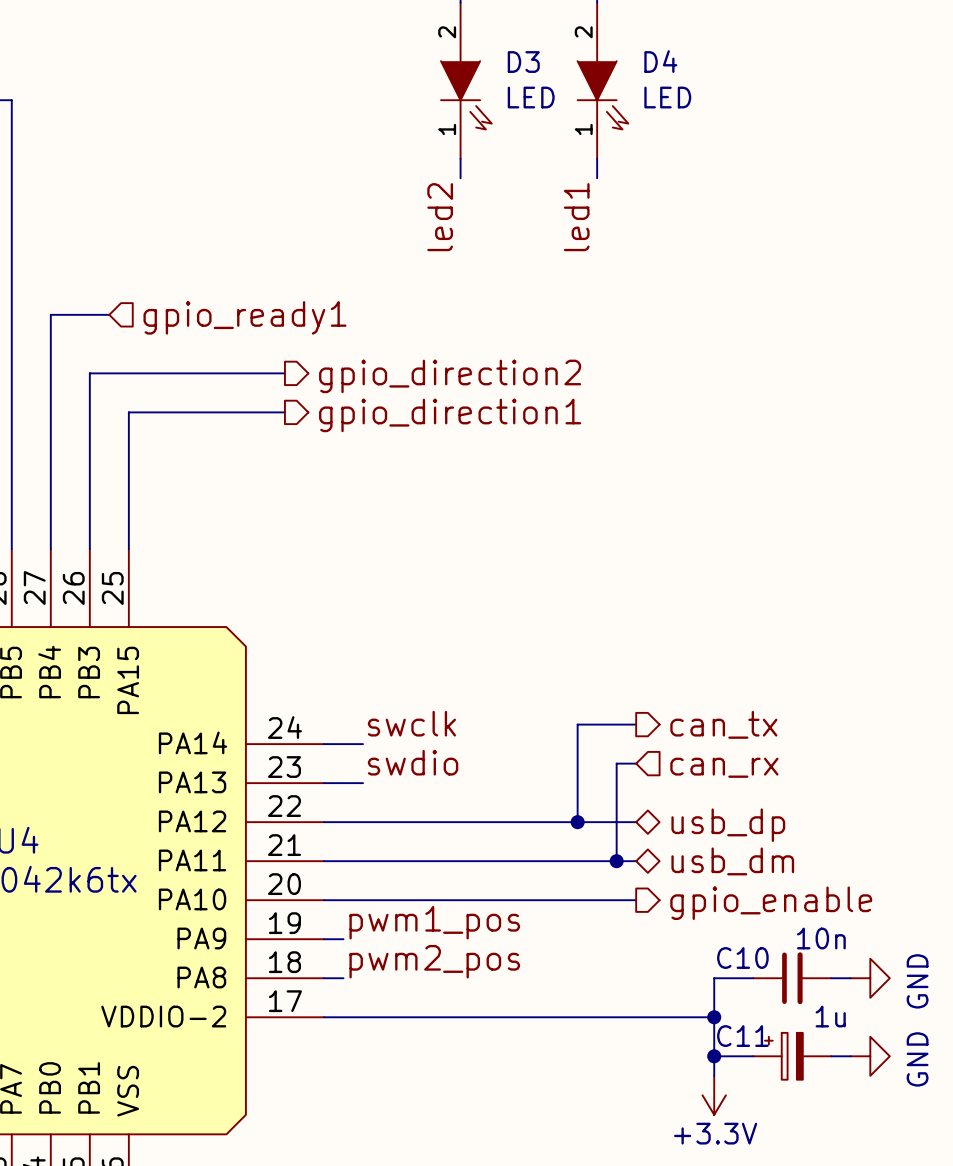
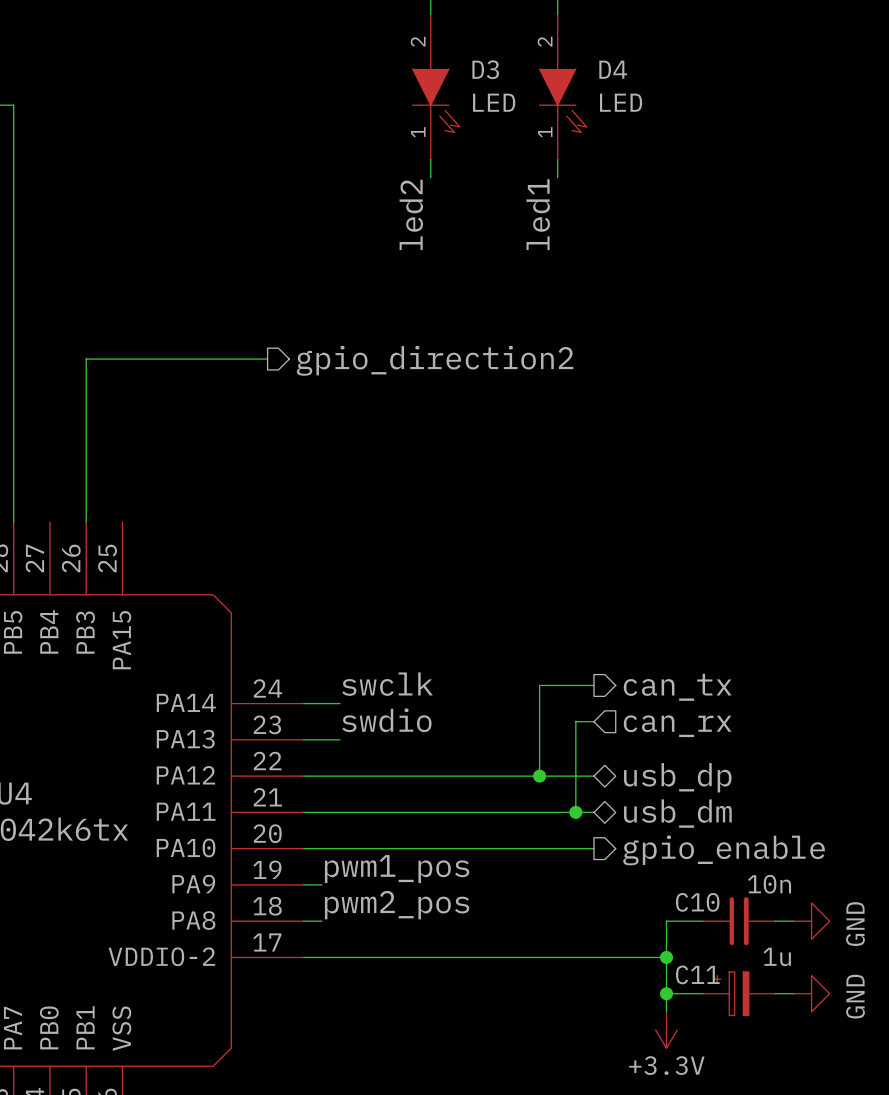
wire: (109, 314) (50, 314) (50, 548) -> none
hierarchical label: gpio_ready1 (244, 317) -> none
wire: (284, 412) (128, 412) (128, 548) -> none
hierarchical label: gpio_direction1 (450, 415) -> none

